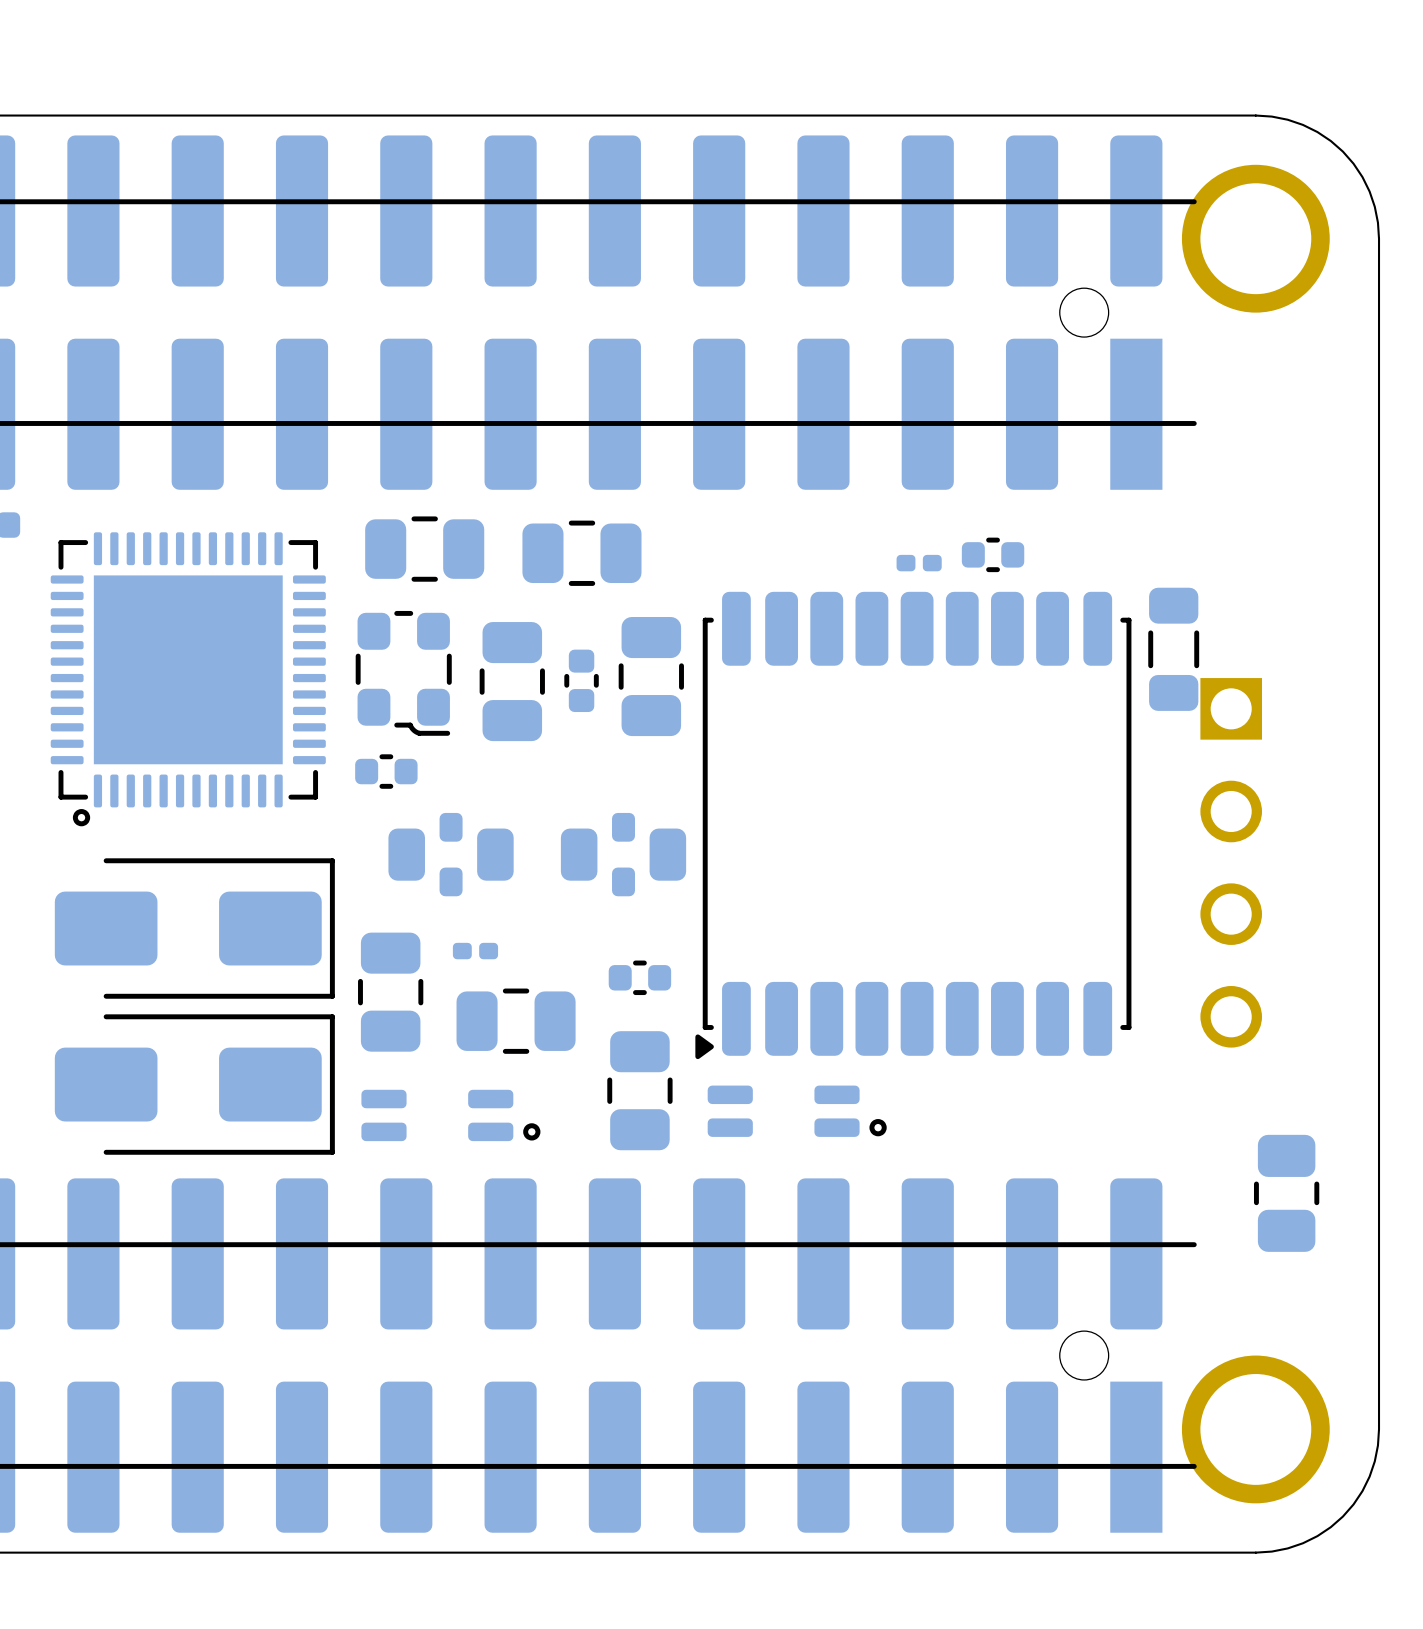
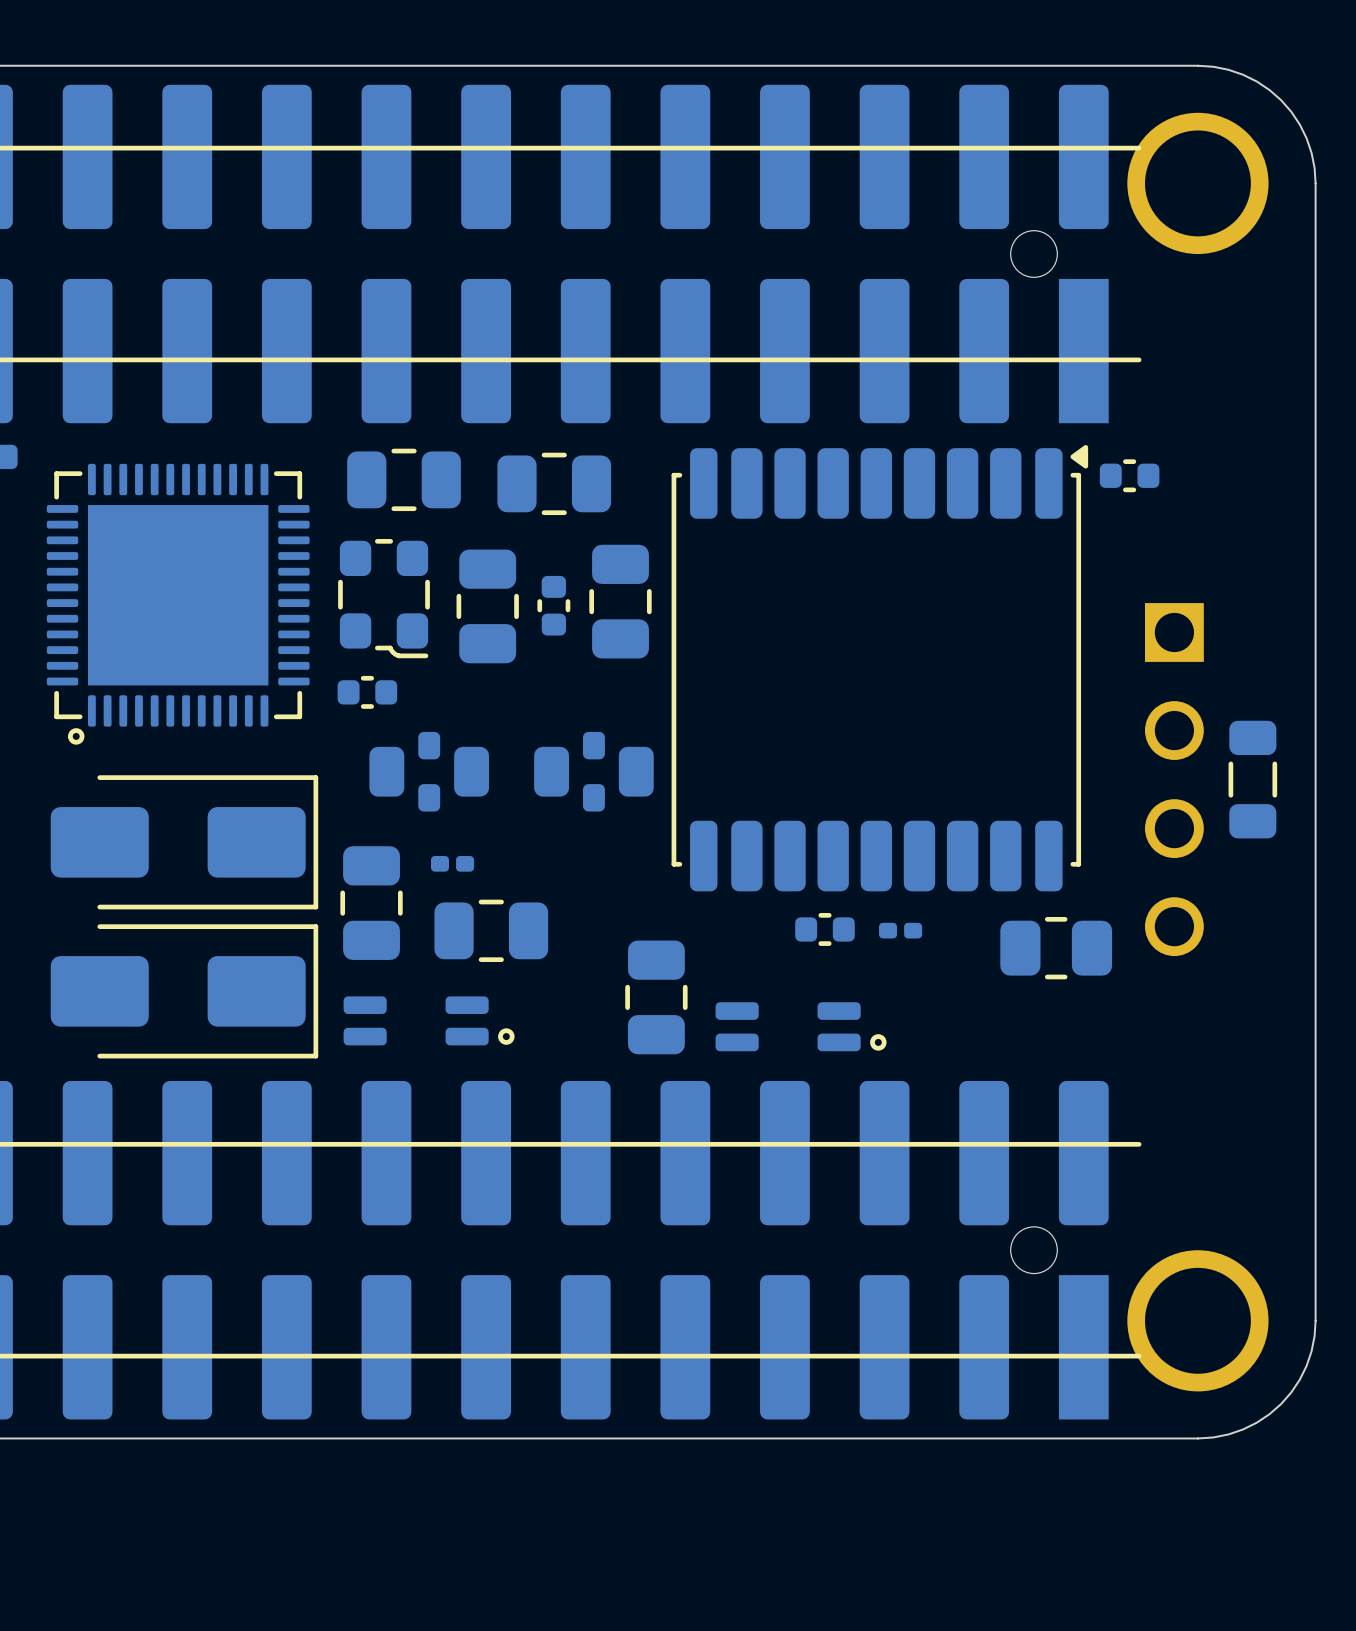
part position: (993, 554) -> (1129, 475)
part position: (919, 563) -> (900, 930)
part position: (1173, 649) -> (1252, 779)
part rotation: 0° (913, 825) -> 180° (879, 668)
part position: (639, 977) -> (824, 929)
part position: (639, 1090) -> (656, 997)
part position: (797, 1111) -> (801, 1026)
part rotation: 0° (1286, 1193) -> 90° clockwise (1056, 948)
part position: (1286, 1193) -> (1056, 948)

